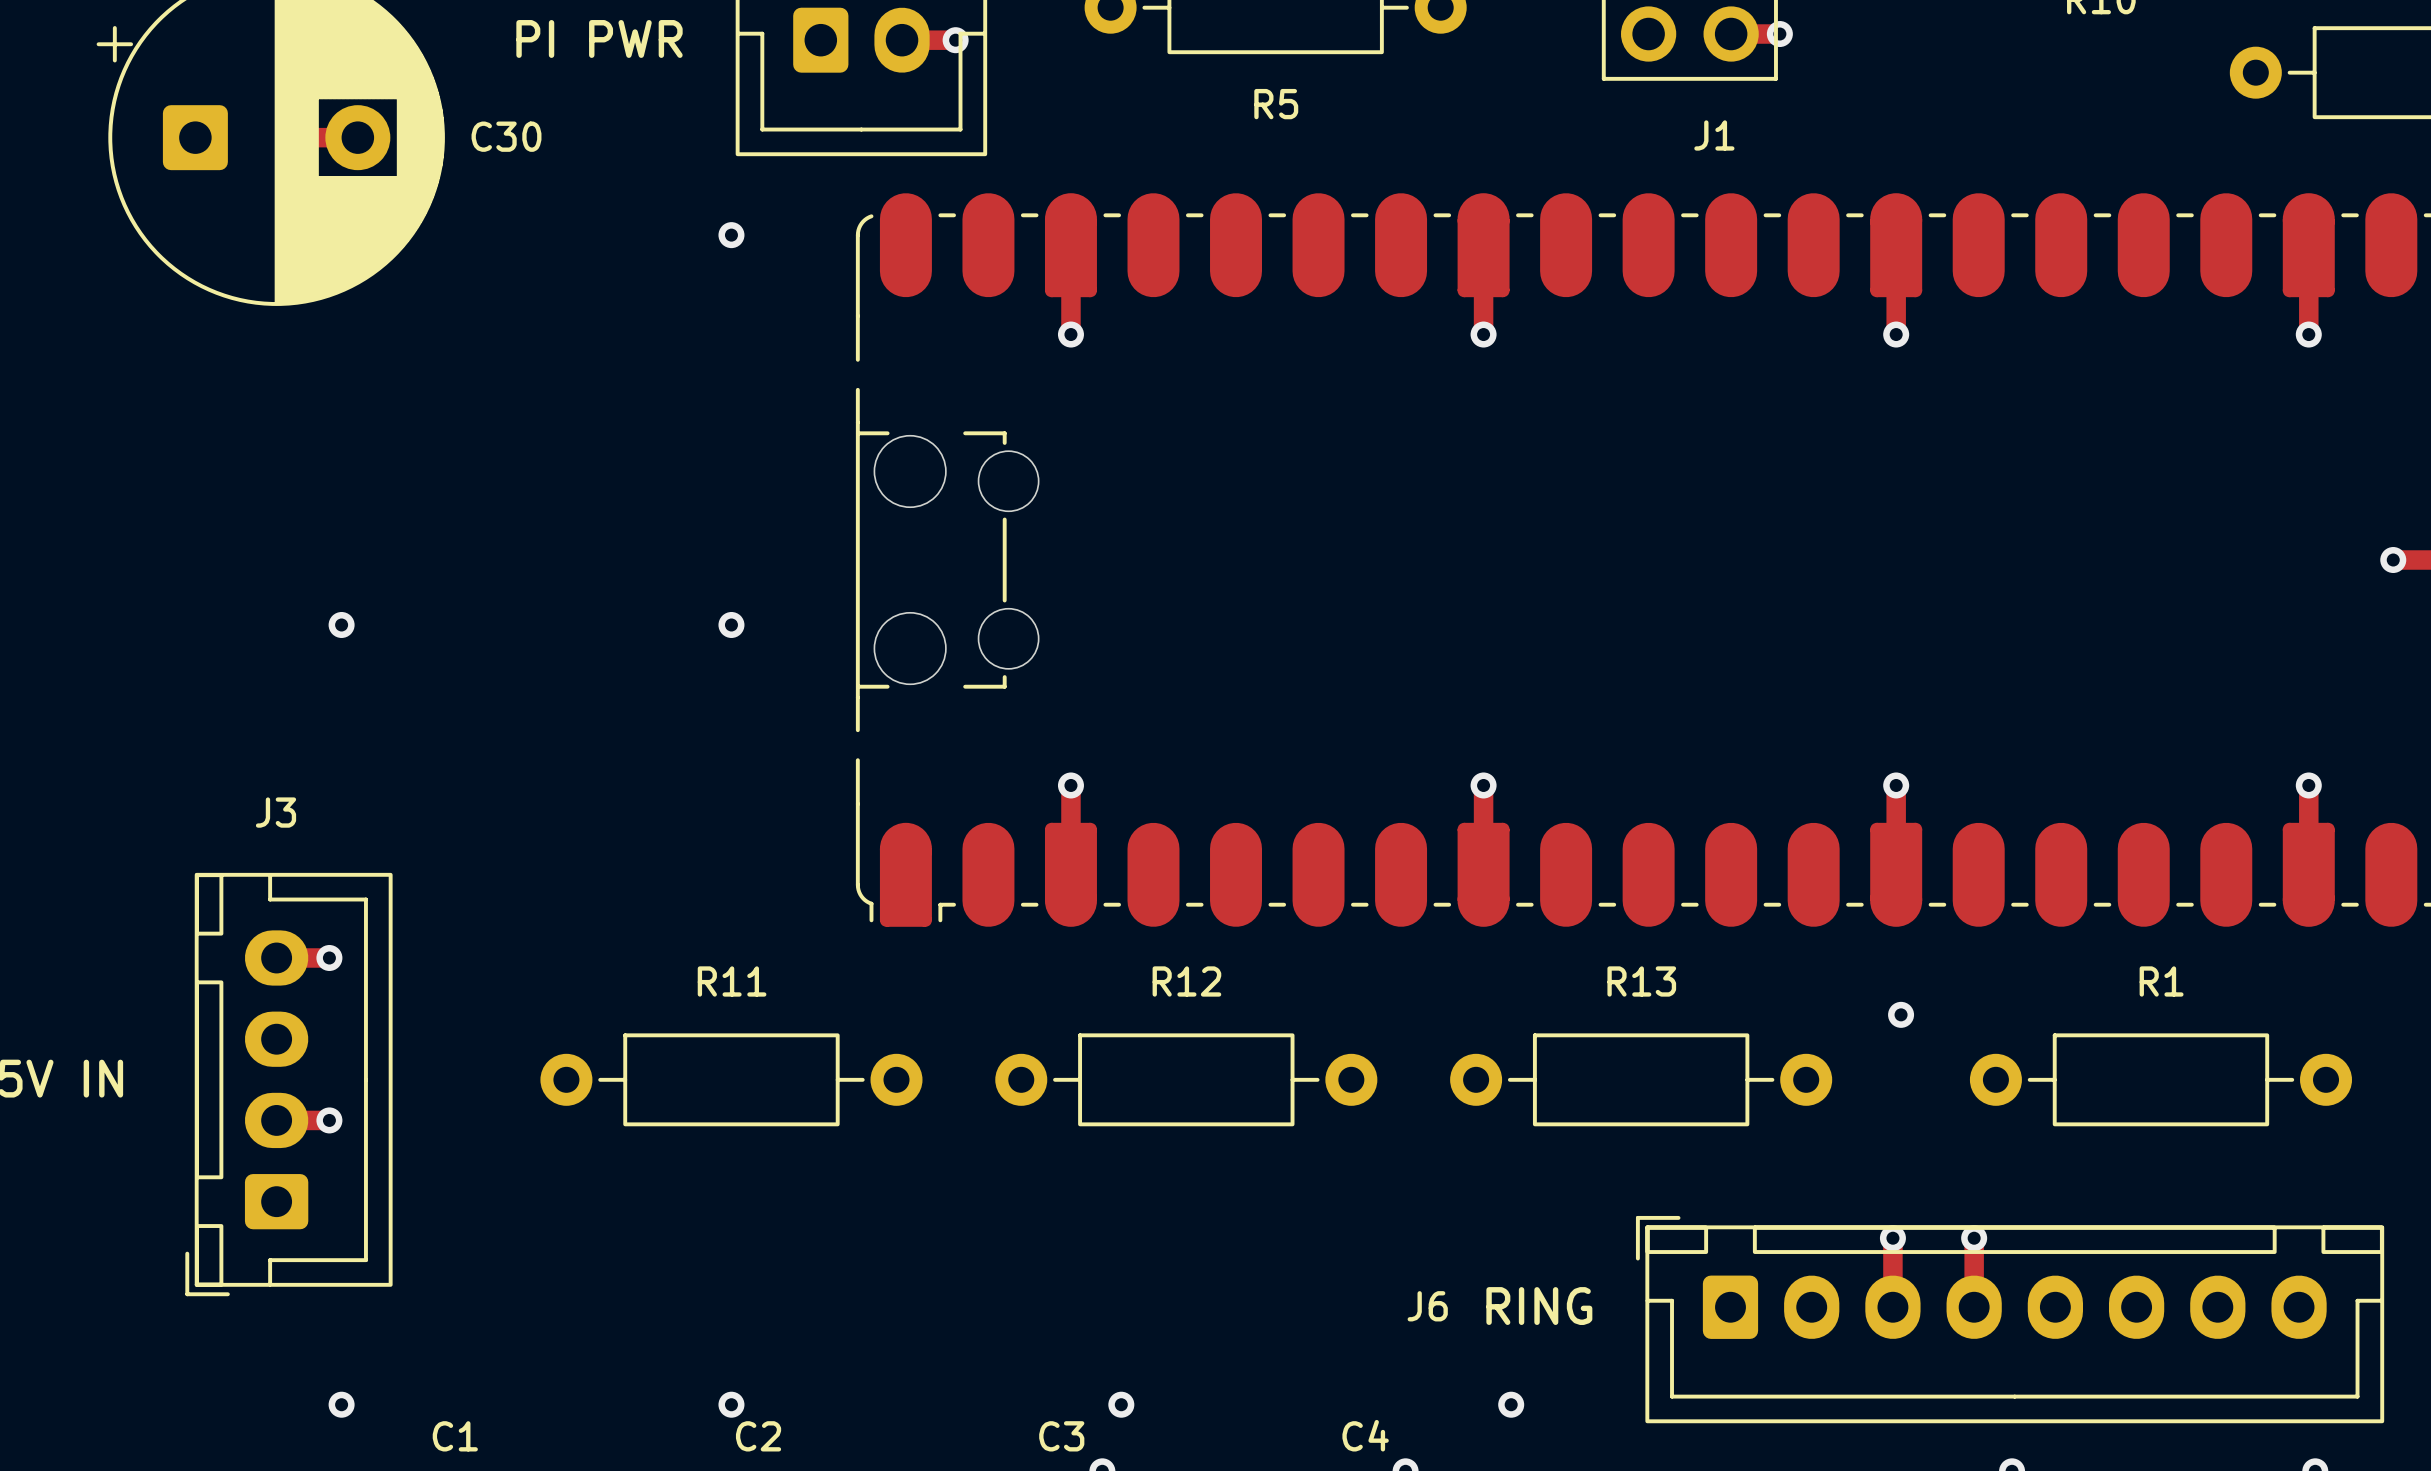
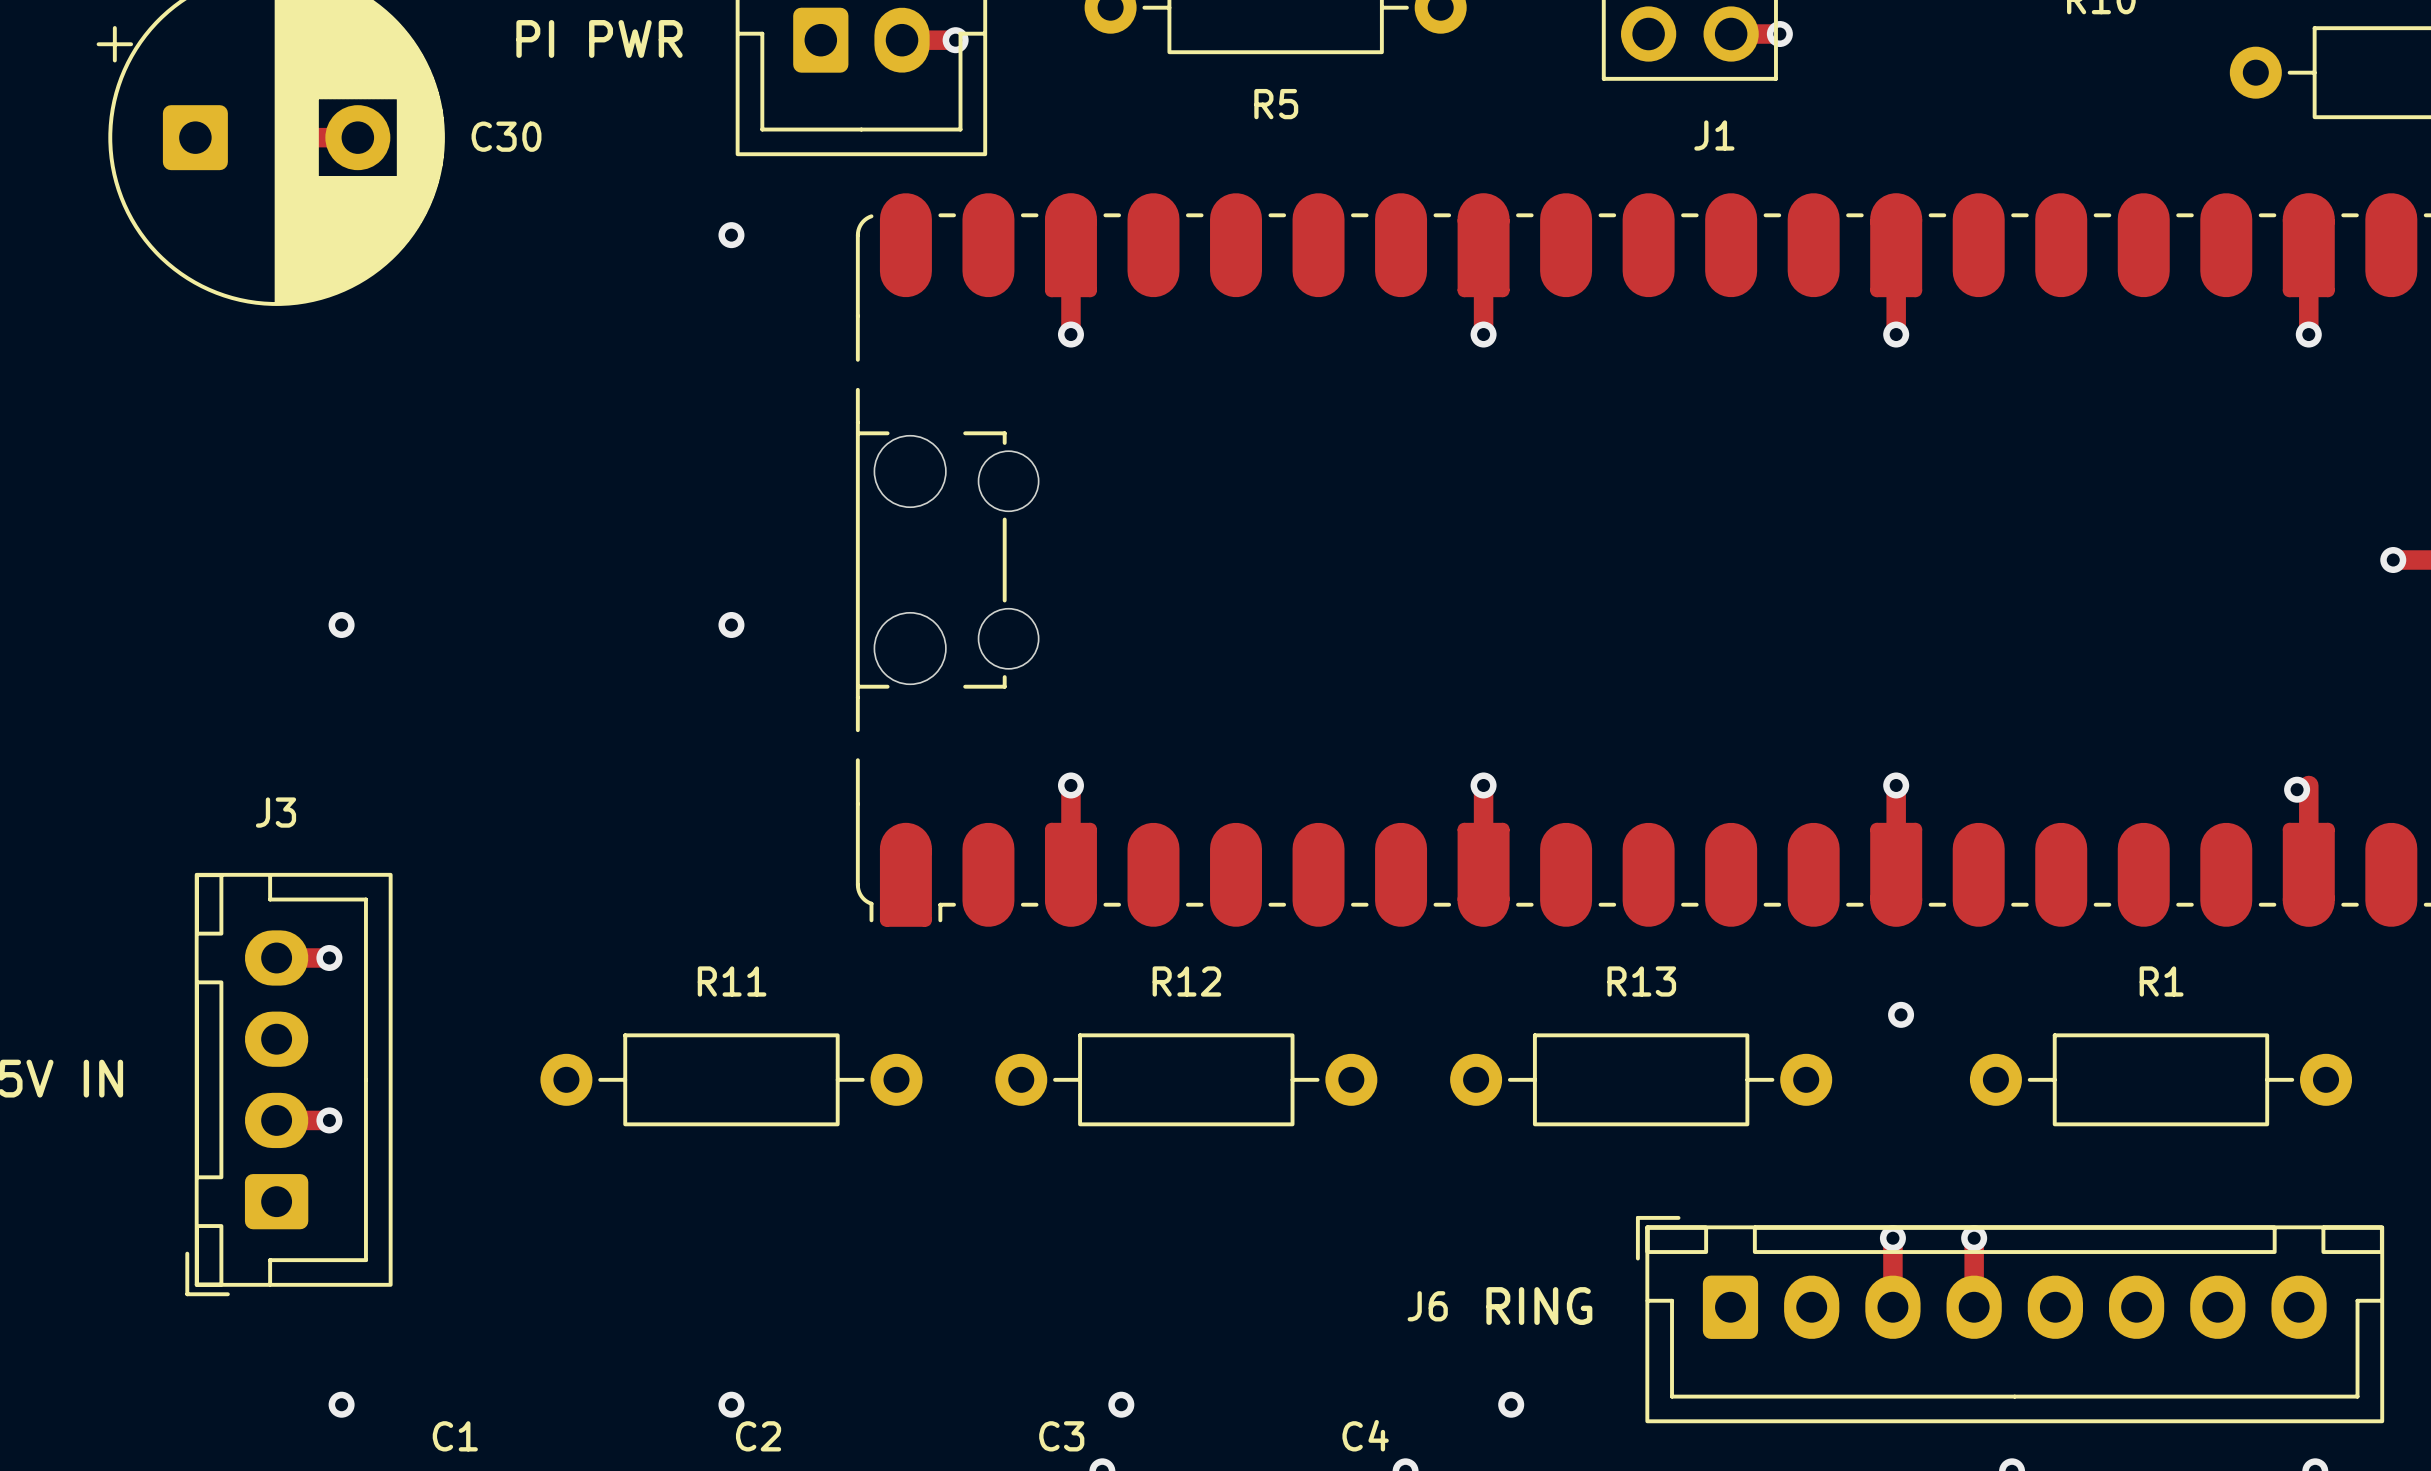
via position: (2308, 785) -> (2297, 789)

